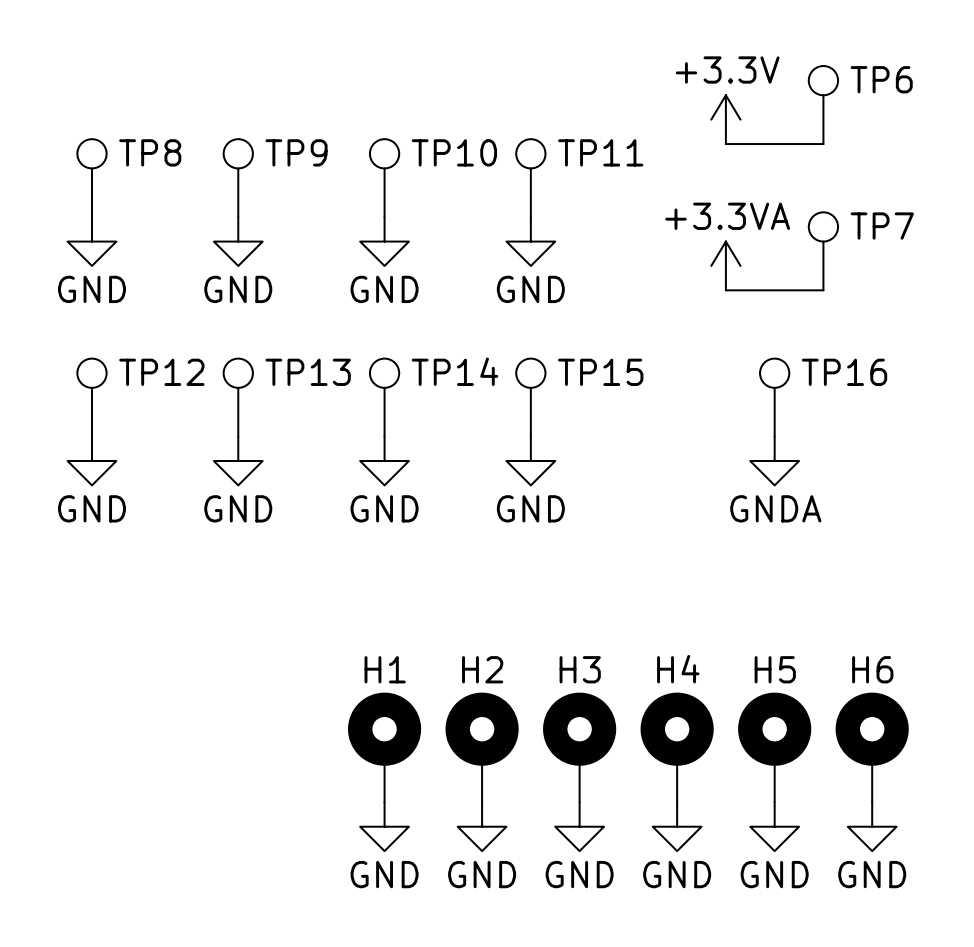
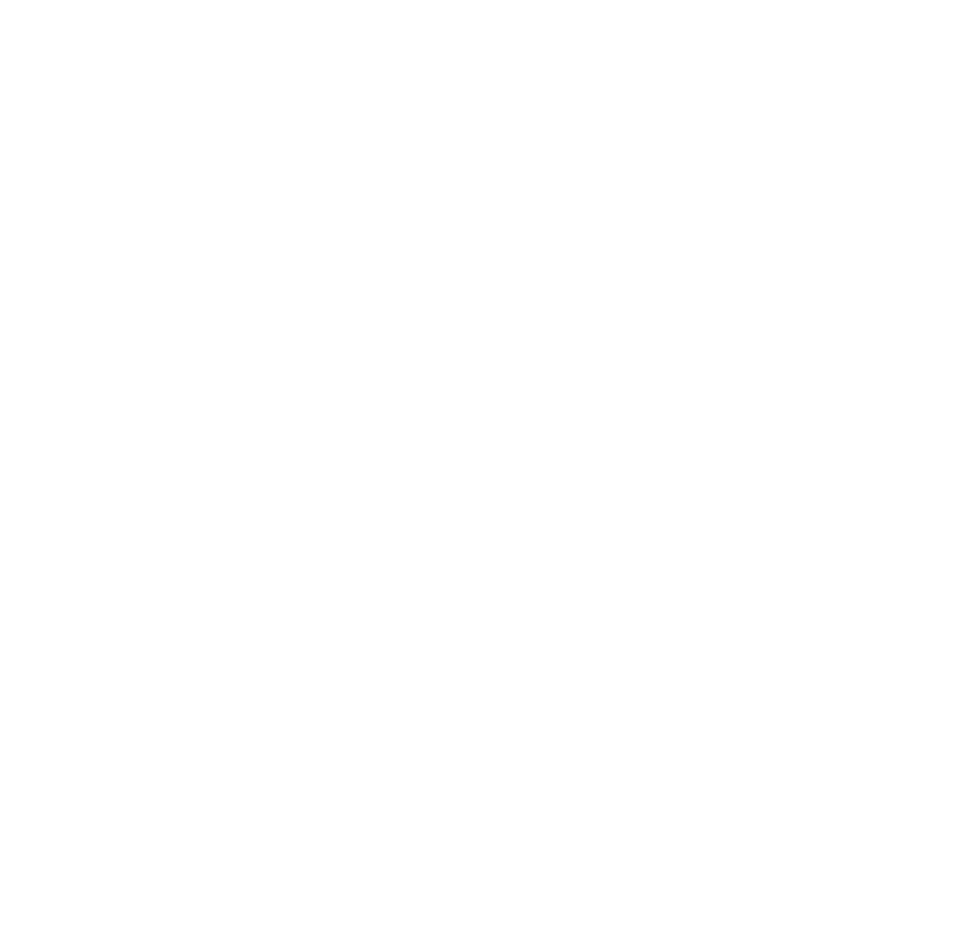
TP6: (823, 105) -> none
power symbol: +3.3V (725, 119) -> none
wire: (725, 144) (823, 144) -> none
TP8: (91, 178) -> none
TP9: (238, 178) -> none
TP10: (384, 178) -> none
TP11: (530, 178) -> none
power symbol: GND (91, 241) -> none
power symbol: GND (238, 241) -> none
power symbol: GND (384, 241) -> none
power symbol: GND (530, 241) -> none
TP7: (823, 251) -> none
power symbol: +3.3VA (725, 265) -> none
wire: (725, 290) (823, 290) -> none
TP12: (91, 397) -> none
TP13: (238, 397) -> none
TP14: (384, 397) -> none
TP15: (530, 397) -> none
TP16: (774, 397) -> none
power symbol: GND (91, 461) -> none
power symbol: GND (238, 461) -> none
power symbol: GND (384, 461) -> none
power symbol: GND (530, 461) -> none
power symbol: GNDA (774, 461) -> none
H1: (384, 747) -> none
H2: (482, 747) -> none
H3: (579, 747) -> none
H4: (677, 747) -> none
H5: (774, 747) -> none
H6: (872, 747) -> none
power symbol: GND (384, 826) -> none
power symbol: GND (482, 826) -> none
power symbol: GND (579, 826) -> none
power symbol: GND (677, 826) -> none
power symbol: GND (774, 826) -> none
power symbol: GND (872, 826) -> none

